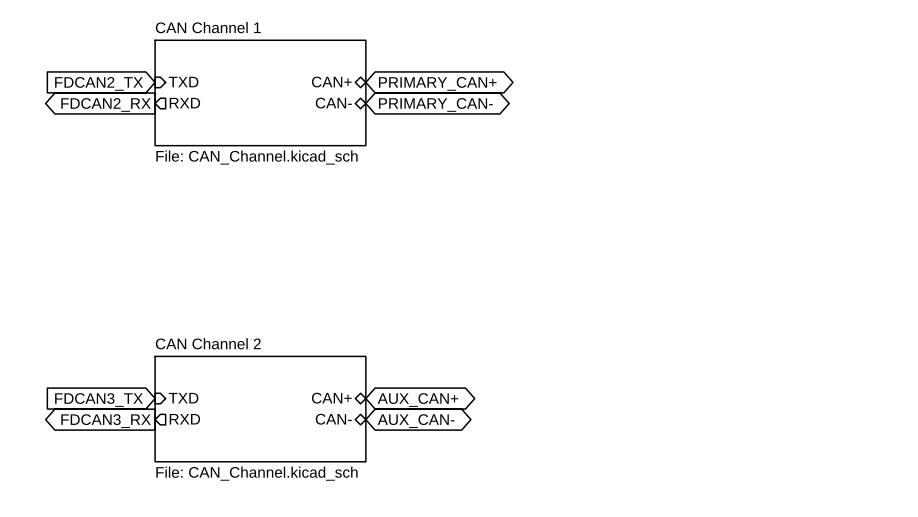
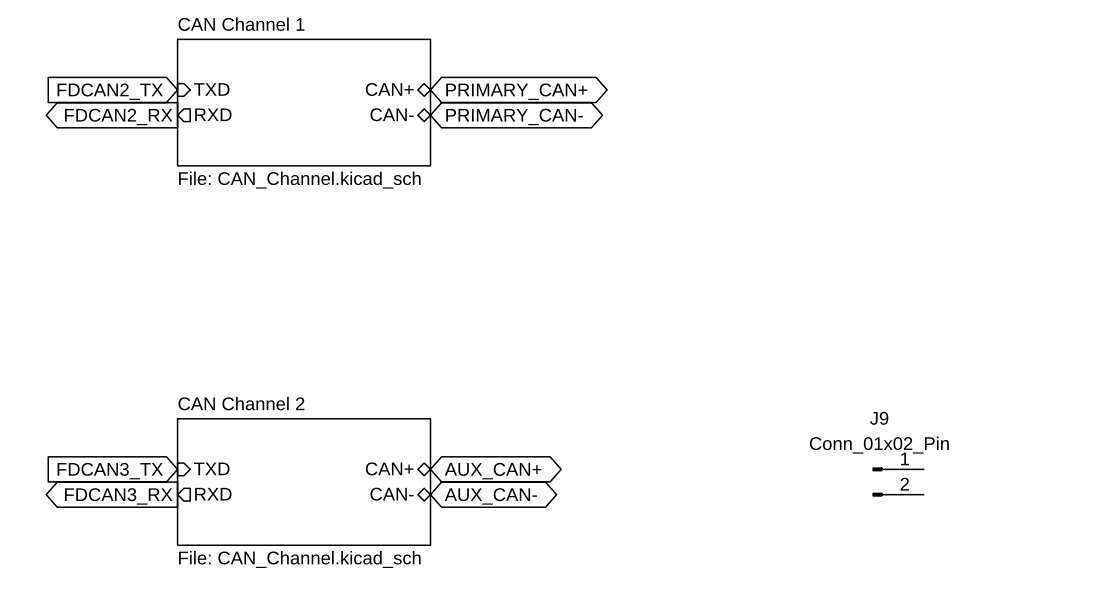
J9: none -> Conn_01x02_Pin (898, 482)

